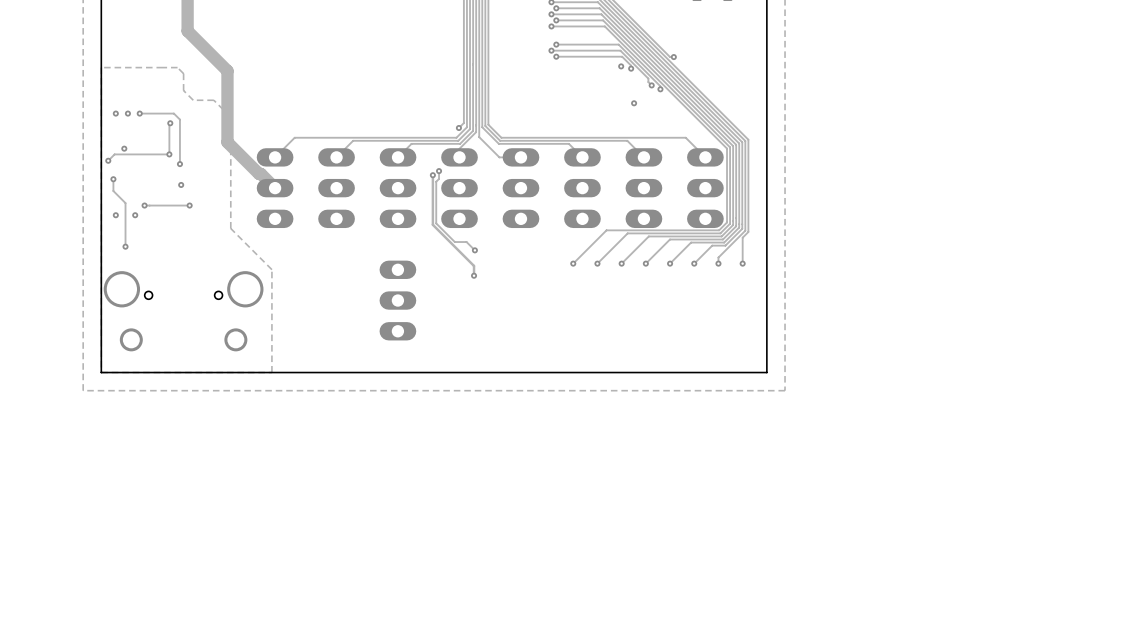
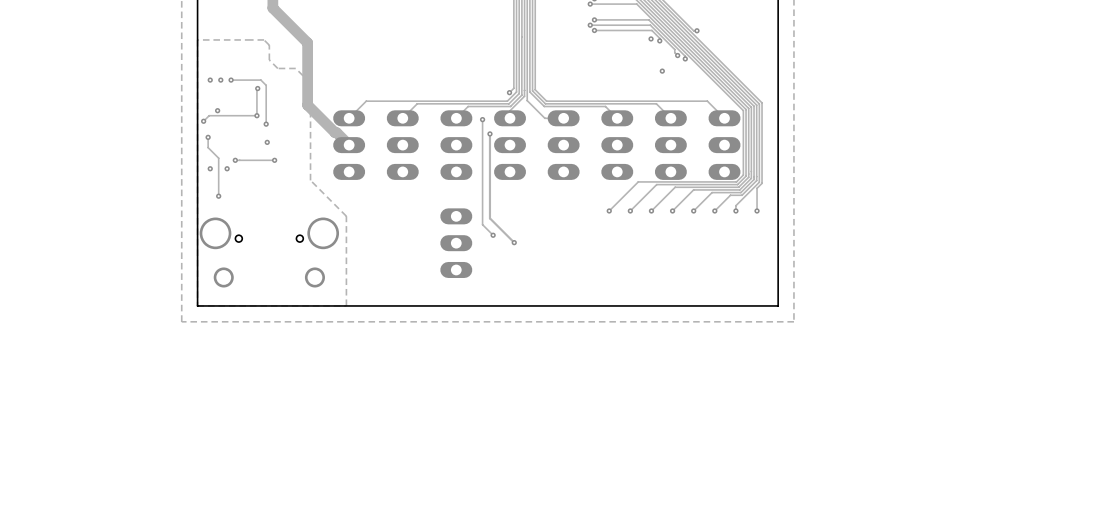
track: none -> (482, 119) (482, 224) (493, 235)
via: none -> (482, 119)
track: (439, 171) (439, 178) (436, 181) (436, 223) (454, 242) (466, 242) (474, 250) -> none
via: (439, 171) -> none
track: (432, 175) (432, 224) (474, 265) (474, 275) -> none
via: (432, 175) -> none
track: none -> (489, 133) (489, 218) (514, 242)
via: none -> (489, 133)
via: (474, 250) -> none
via: (474, 275) -> none
via: none -> (493, 235)
via: none -> (514, 242)

